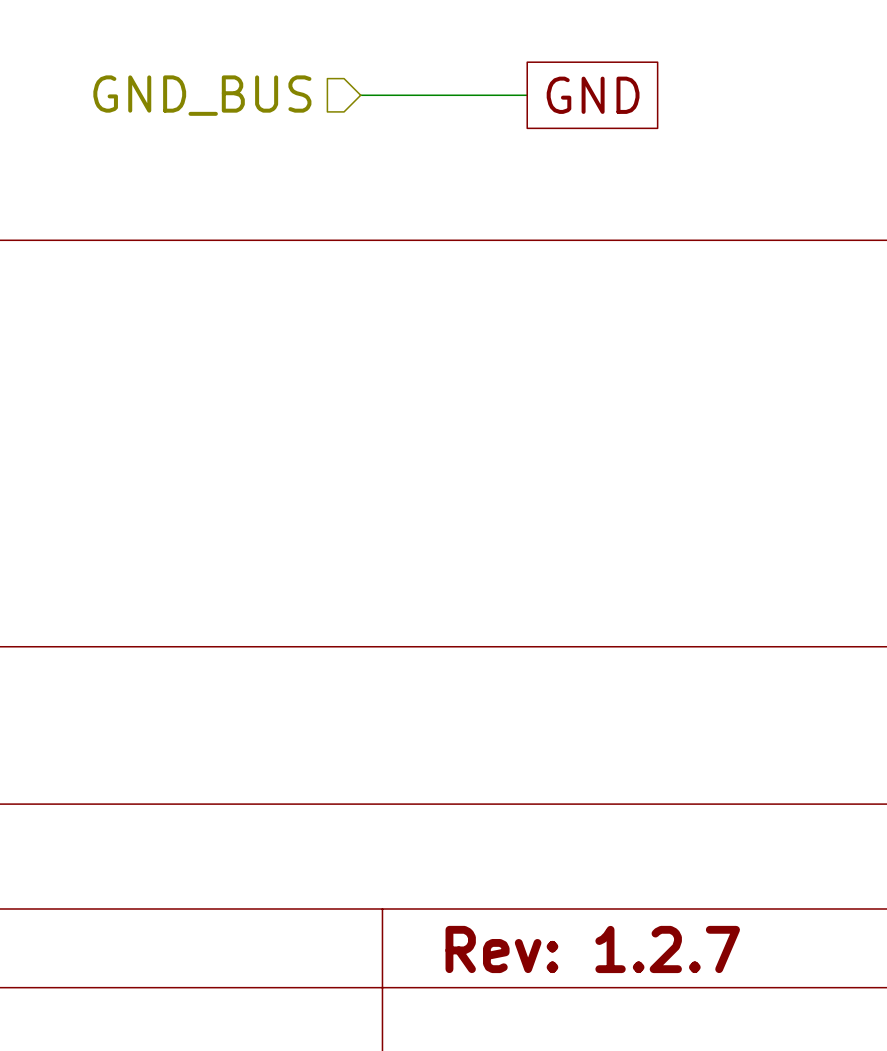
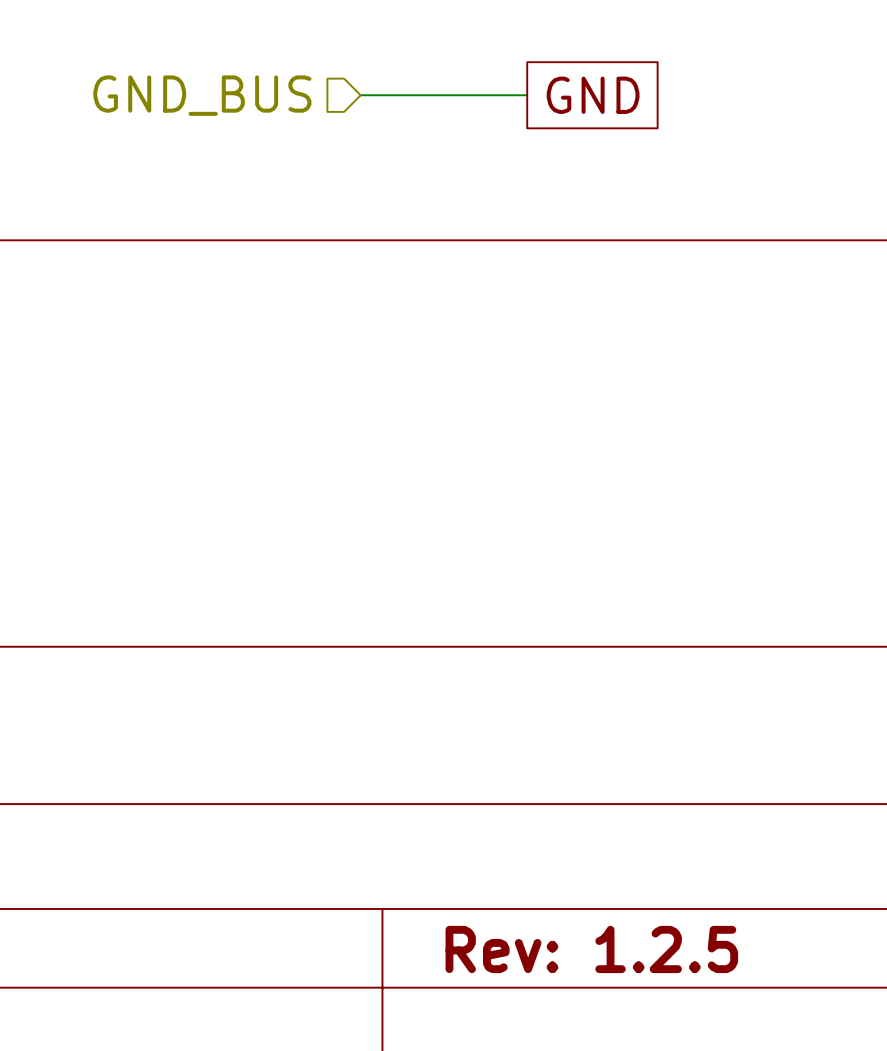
title block: Rev: 1.2.7 (592, 949) -> Rev: 1.2.5 (591, 949)

